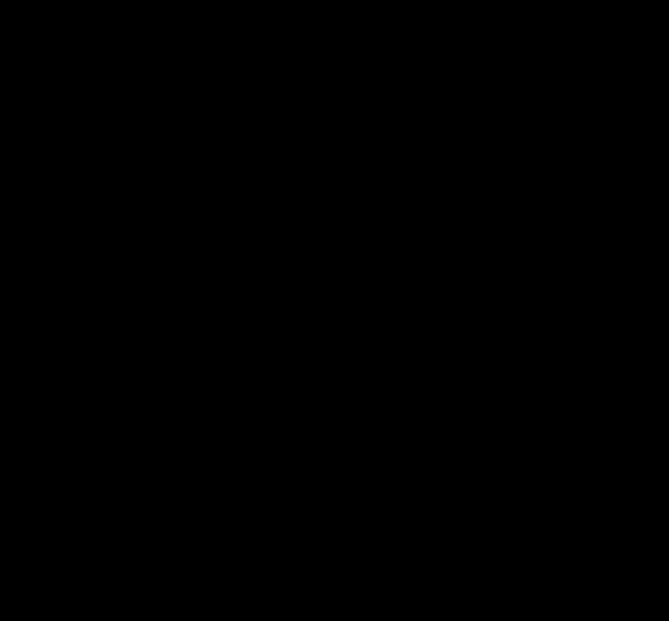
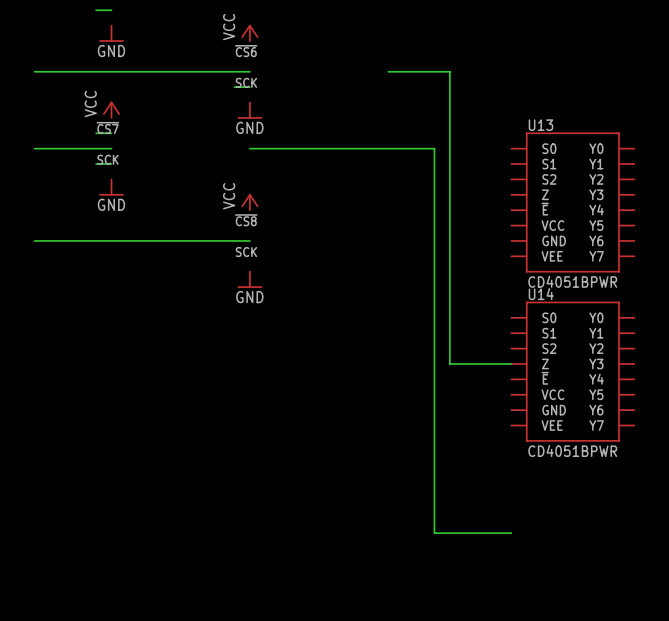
wire: none -> (96, 10) (111, 10)
power symbol: none -> VCC (249, 32)
power symbol: none -> GND (111, 33)
label: none -> ~{CS6} (246, 51)
wire: none -> (34, 71) (249, 71)
wire: none -> (388, 71) (449, 71) (449, 363) (511, 363)
label: none -> SCK (246, 82)
wire: none -> (234, 87) (249, 87)
power symbol: none -> VCC (111, 109)
power symbol: none -> GND (249, 110)
label: none -> ~{CS7} (107, 127)
wire: none -> (96, 133) (111, 133)
wire: none -> (34, 148) (111, 148)
wire: none -> (249, 148) (434, 148) (434, 533) (511, 533)
label: none -> SCK (108, 159)
wire: none -> (96, 164) (111, 164)
power symbol: none -> GND (111, 187)
power symbol: none -> VCC (249, 202)
U13: none -> CD4051BPWR (572, 202)
label: none -> ~{CS8} (246, 220)
wire: none -> (34, 240) (249, 240)
label: none -> SCK (246, 252)
power symbol: none -> GND (249, 279)
U14: none -> CD4051BPWR (572, 371)

